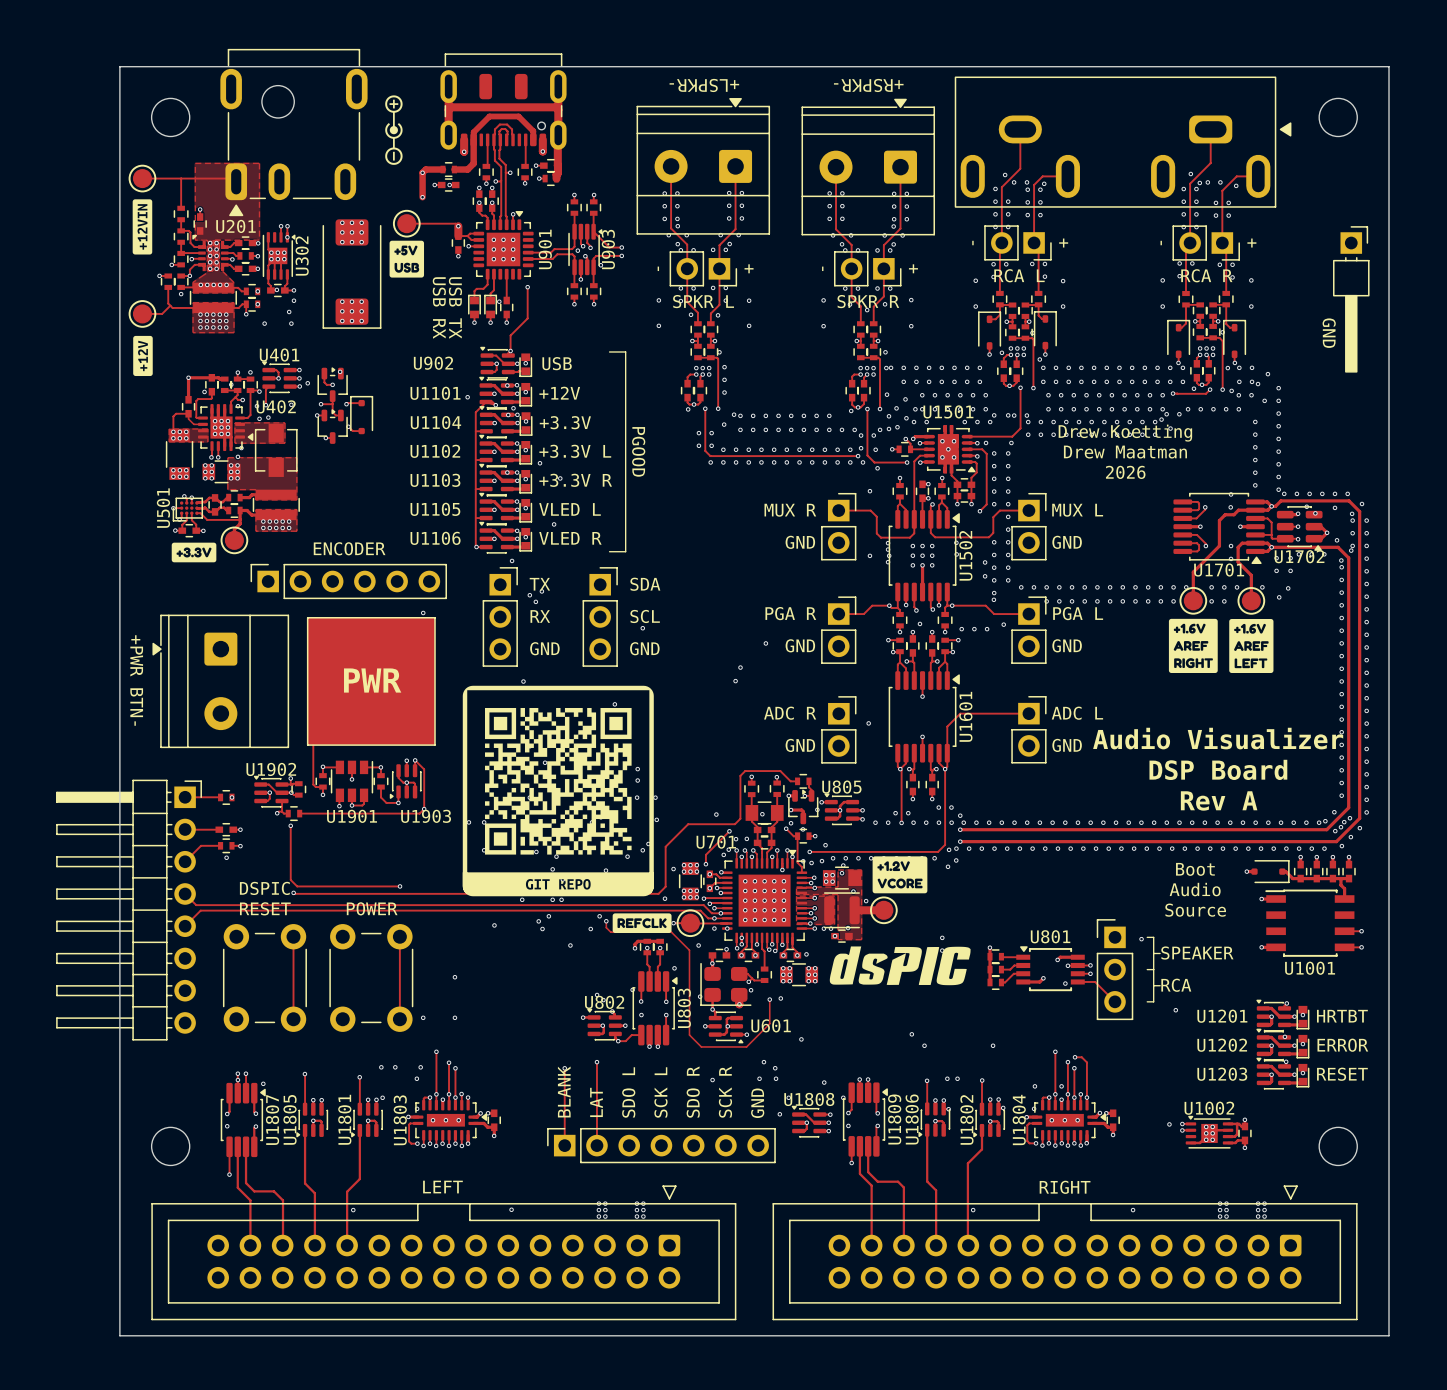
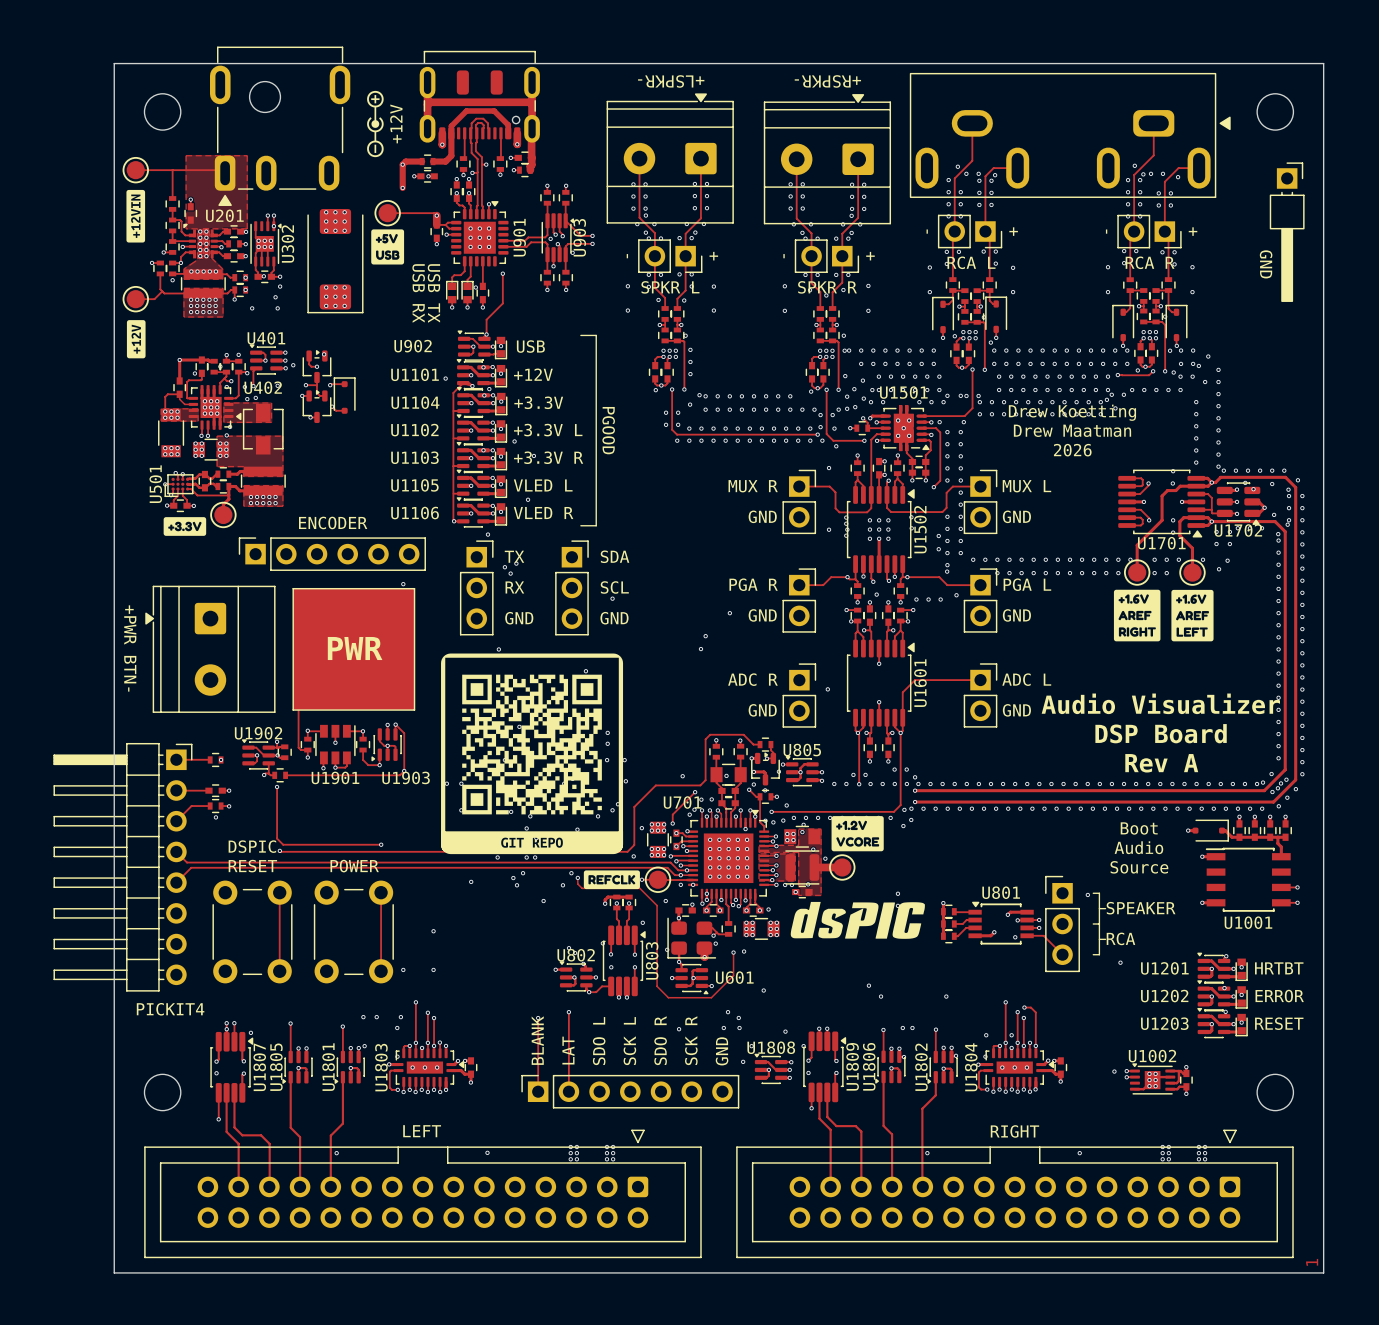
text: none -> +12V (396, 123)
part position: (1351, 299) -> (1287, 232)
text position: GND (1329, 333) -> GND (1266, 264)
text: none -> PICKIT4 (170, 1009)
text: none -> 1 (1312, 1262)

